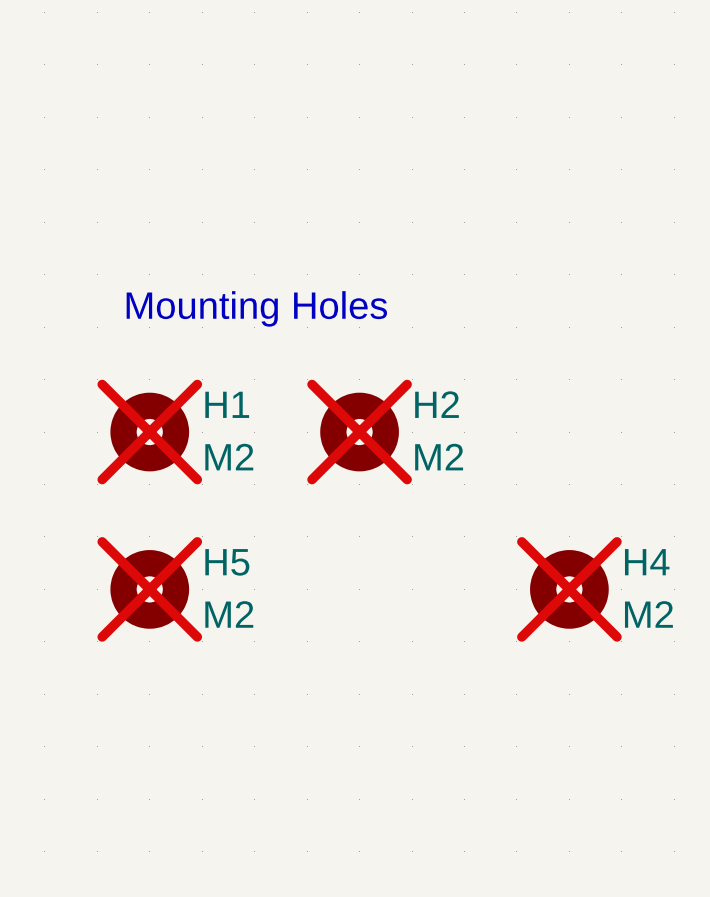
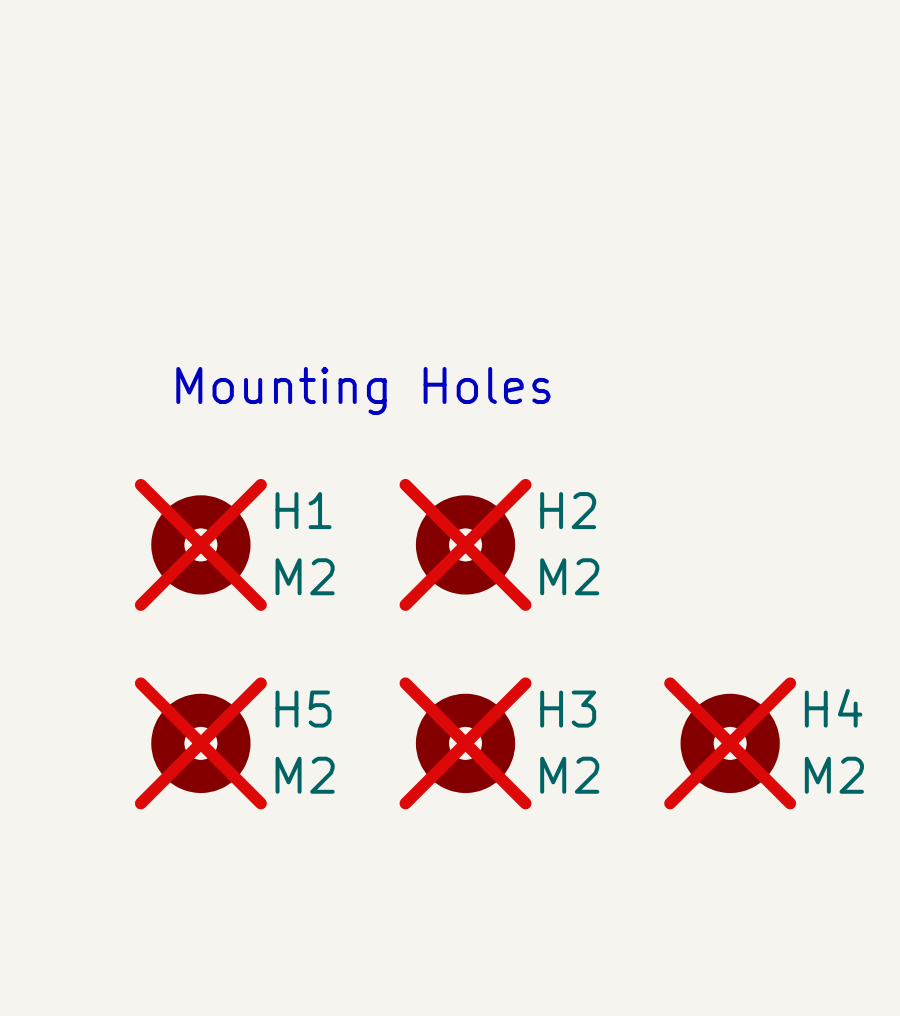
H3: none -> M2 (465, 743)

